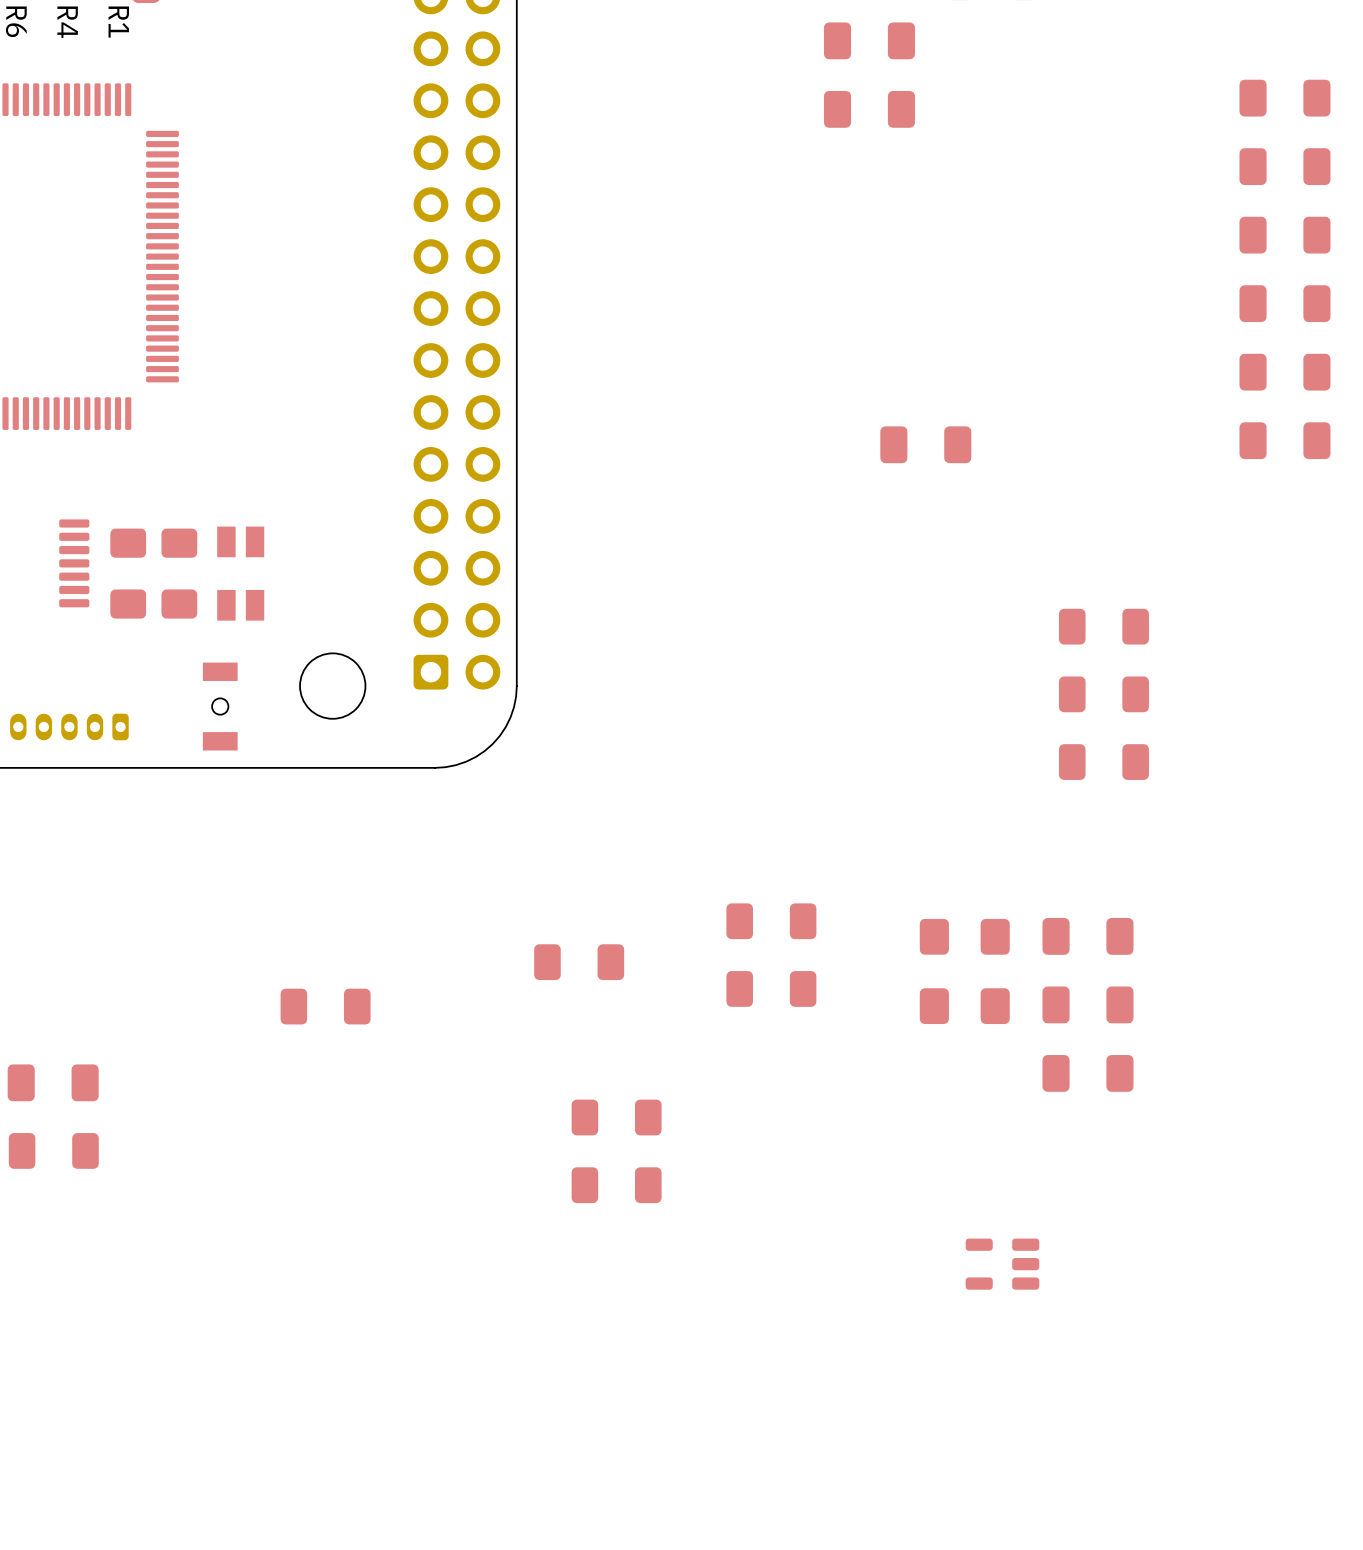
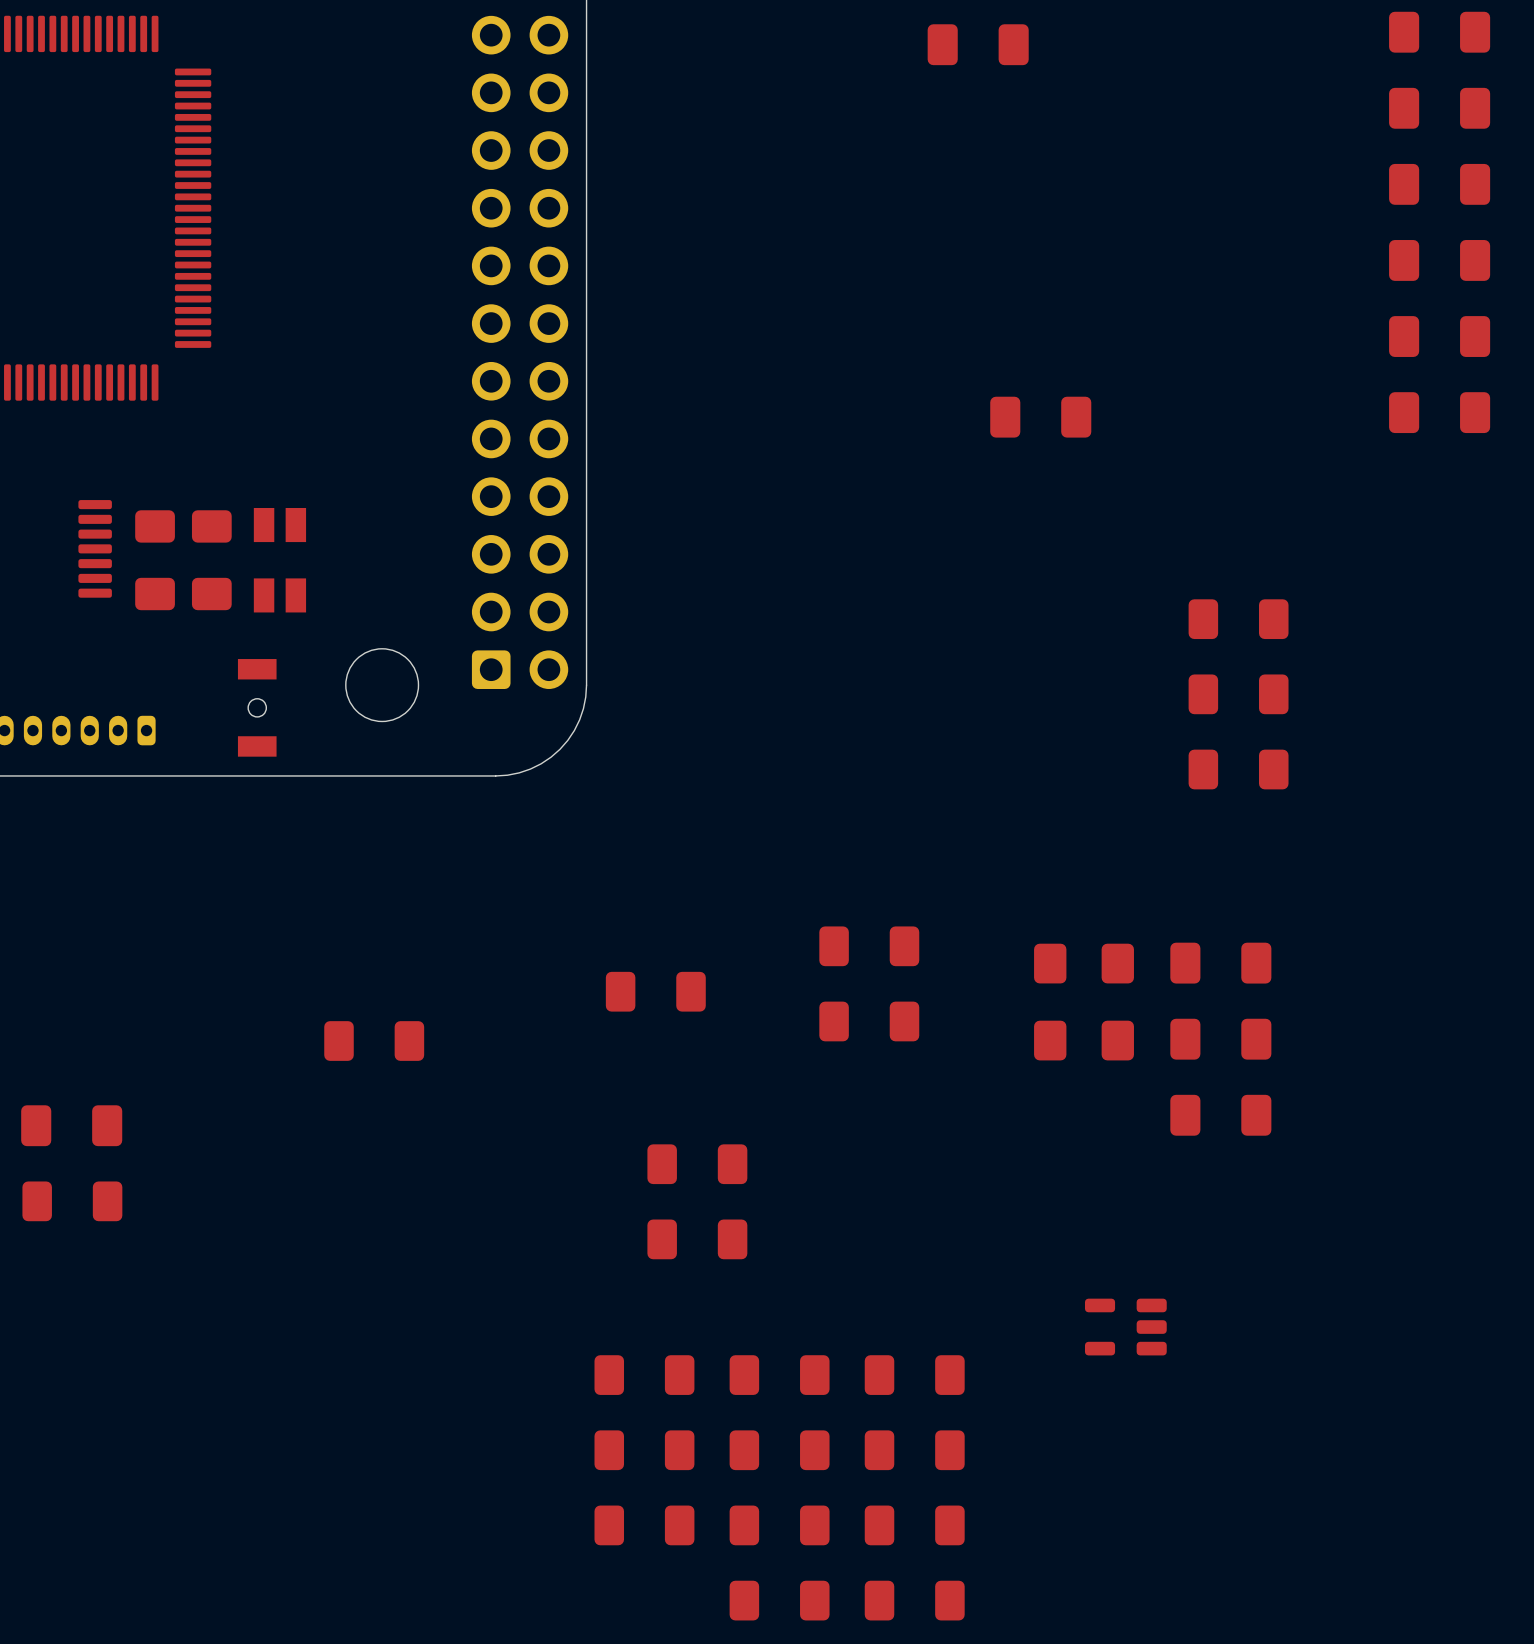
part: none -> (644, 1375)
part: none -> (779, 1375)
part: none -> (914, 1375)
part: none -> (644, 1450)
part: none -> (779, 1450)
part: none -> (914, 1450)
part: none -> (644, 1525)
part: none -> (779, 1525)
part: none -> (914, 1525)
part: none -> (779, 1600)
part: none -> (914, 1600)

